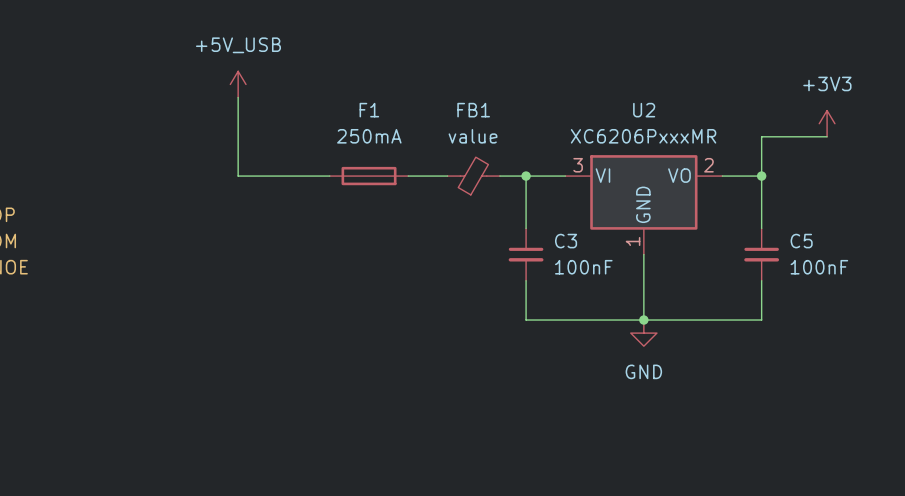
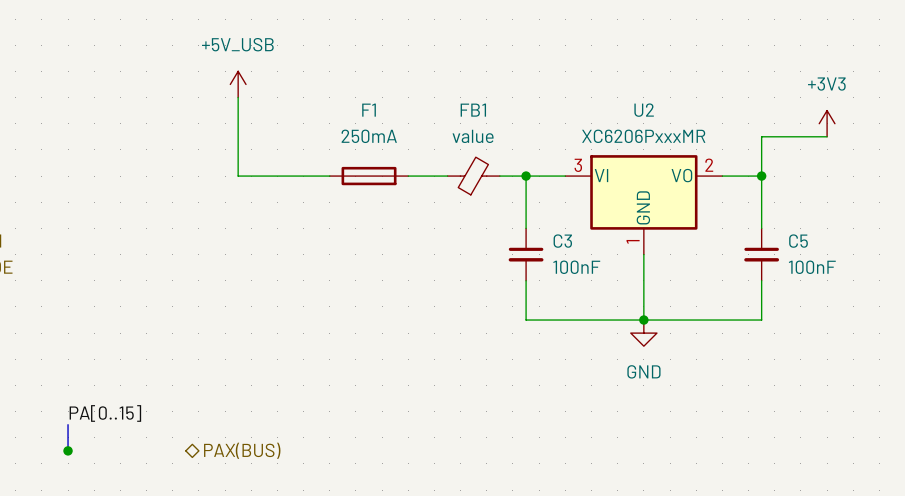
label: none -> PA[0..15] (105, 413)
bus: none -> (68, 424) (68, 450)
junction: none -> (68, 450)
hierarchical label: none -> PAX(BUS) (242, 450)

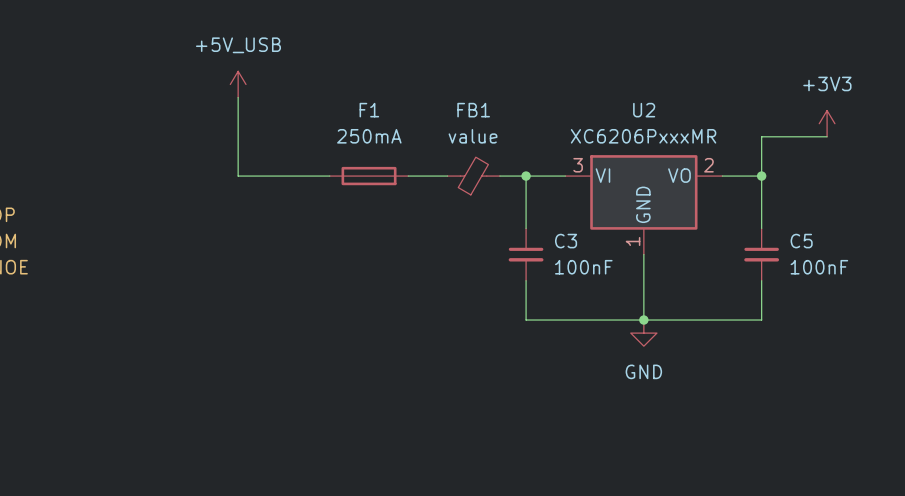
label: PA[0..15] (105, 413) -> none
bus: (68, 424) (68, 450) -> none
junction: (68, 450) -> none
hierarchical label: PAX(BUS) (242, 450) -> none

